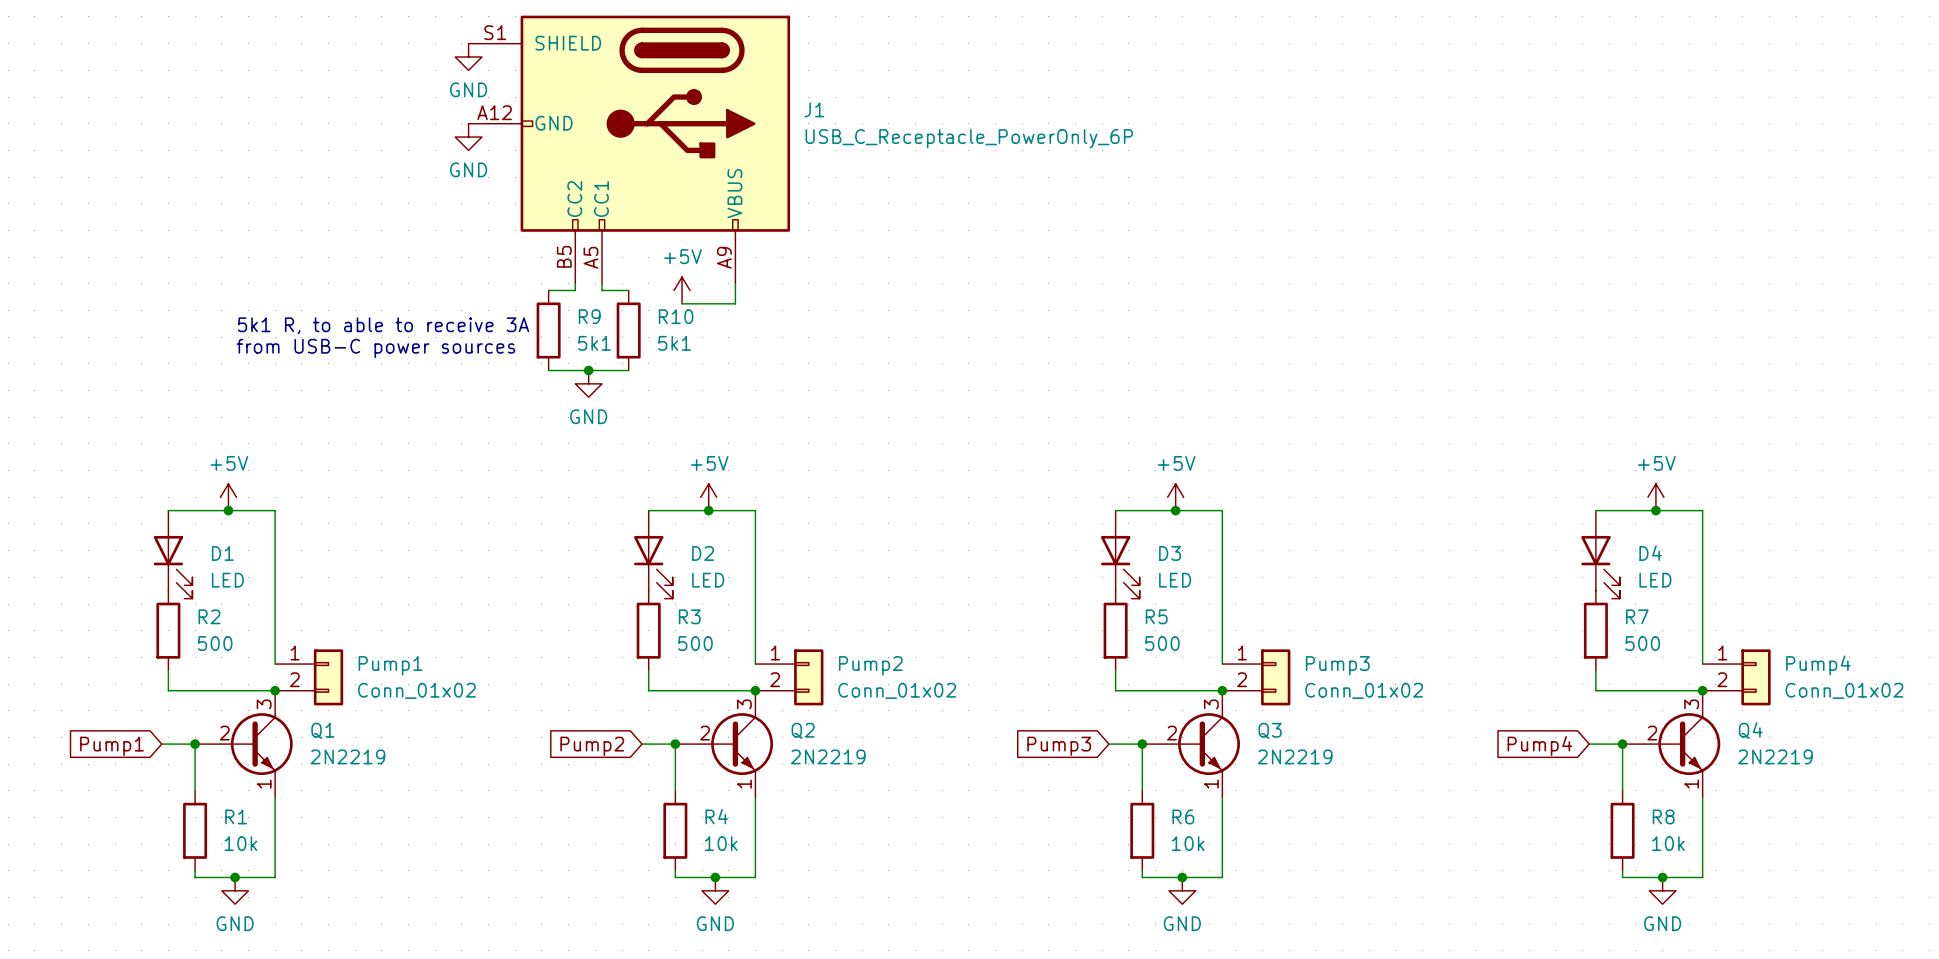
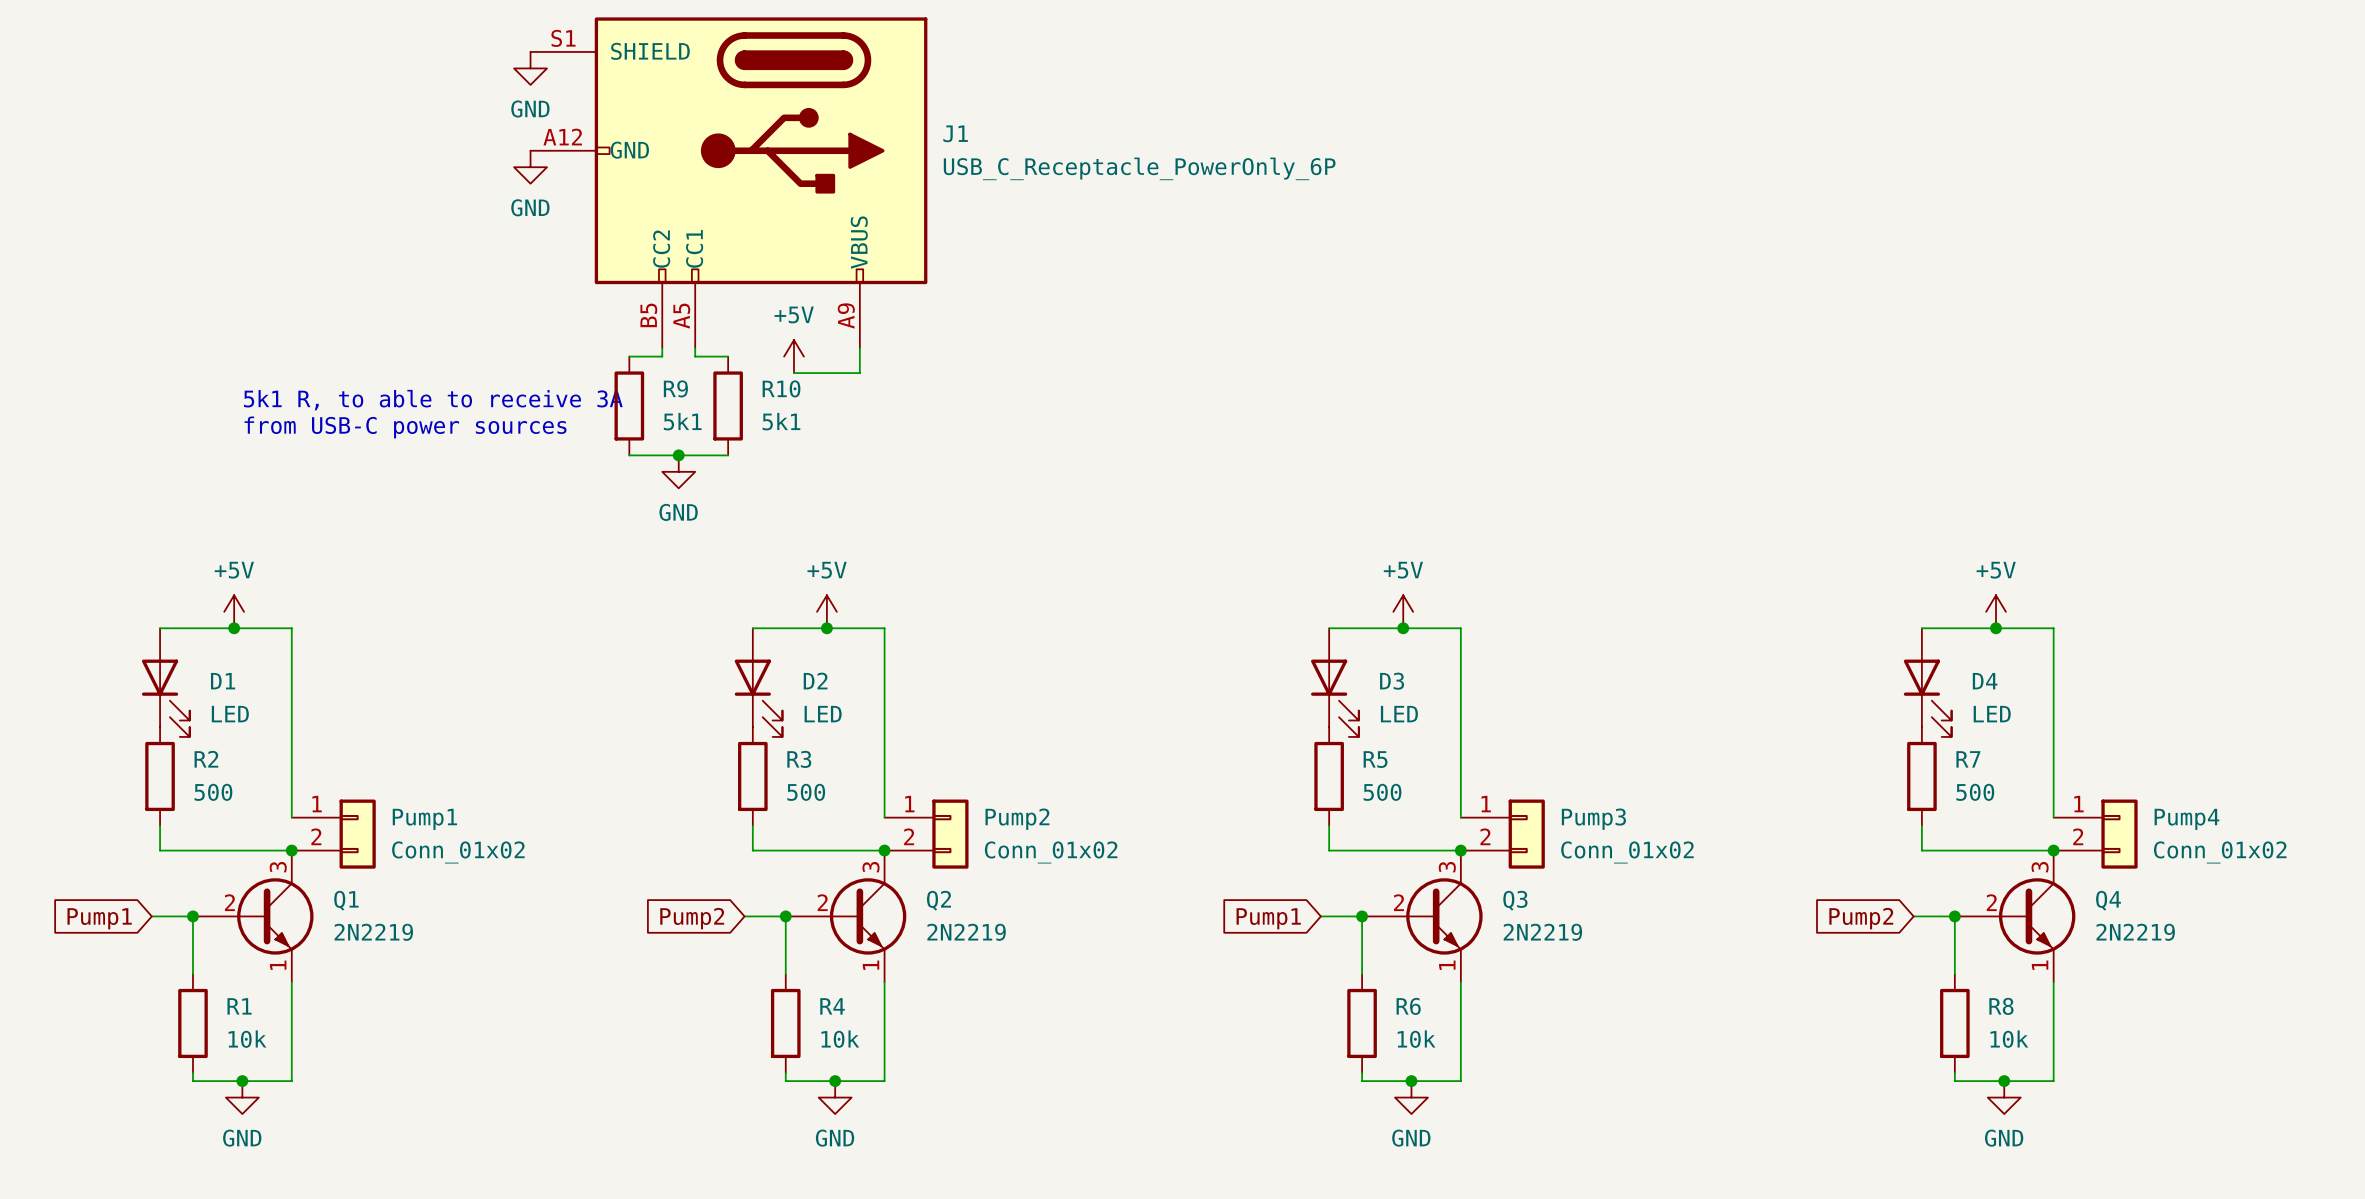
global label: Pump4 (1539, 745) -> Pump2 (1861, 918)
global label: Pump3 (1059, 746) -> Pump1 (1268, 918)

